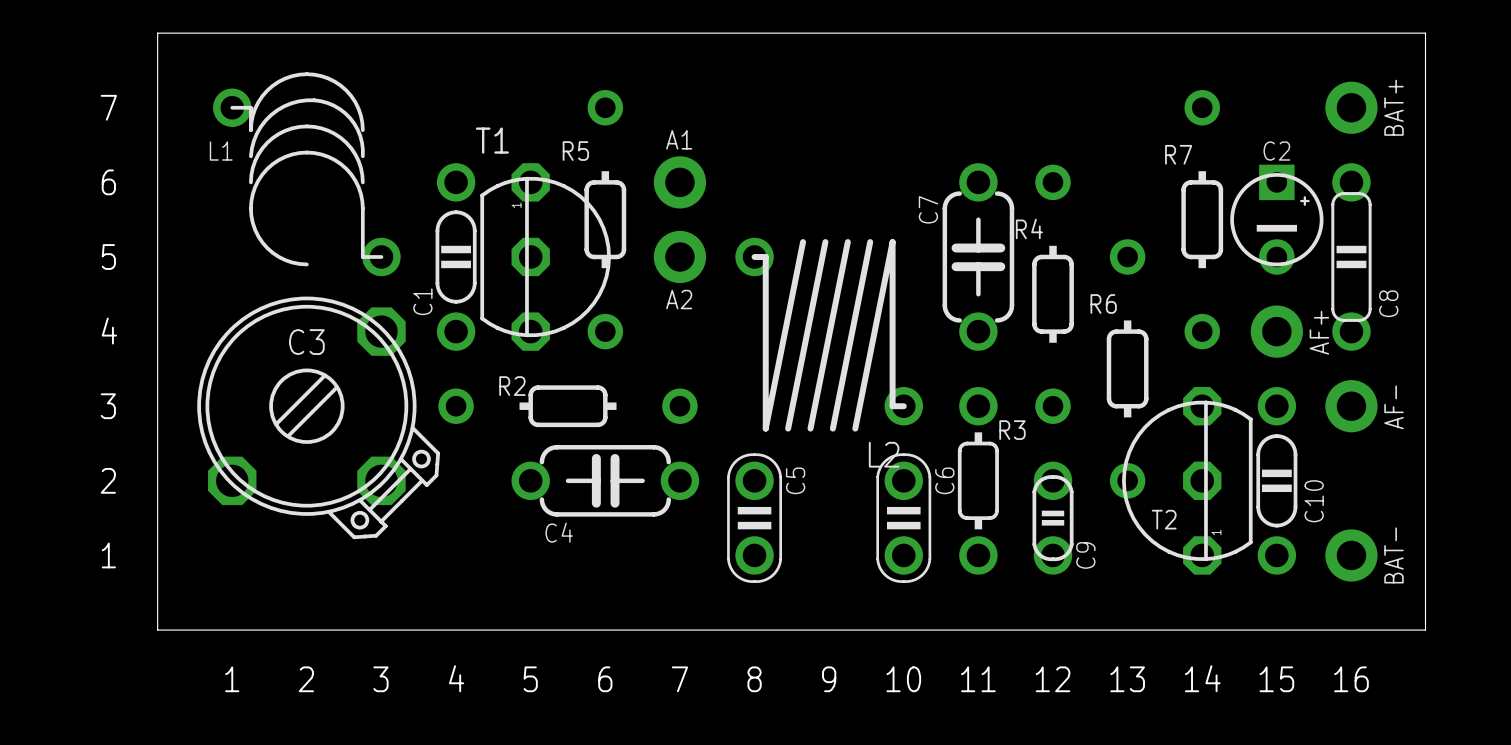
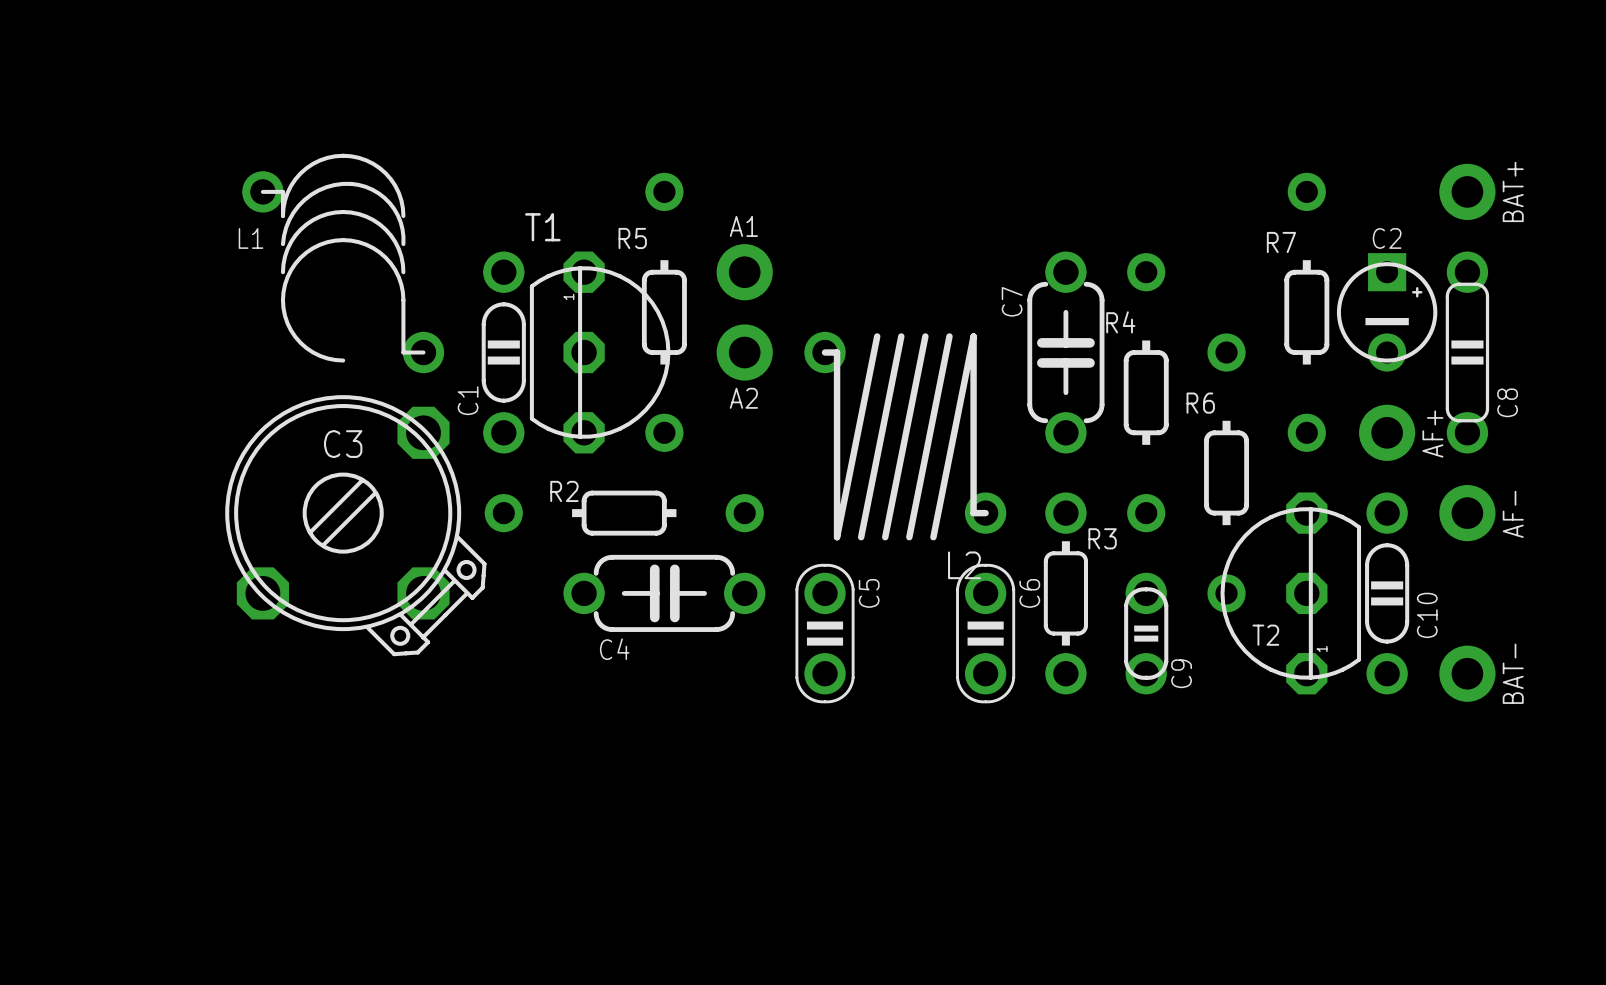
board edge: (157, 33) (1425, 33) (1425, 630) (157, 630) (157, 33) -> none
text: 7 (108, 107) -> none
text: 6 (108, 182) -> none
text: 5 (108, 256) -> none
text: 4 (109, 331) -> none
text: 3 (108, 406) -> none
text: 2 (108, 480) -> none
text: 1 (108, 555) -> none
text: 4 (456, 678) -> none
text: 14 (1202, 678) -> none
text: 1 (232, 679) -> none
text: 2 (306, 679) -> none
text: 3 (380, 679) -> none
text: 5 (530, 679) -> none
text: 6 (605, 679) -> none
text: 7 (679, 679) -> none
text: 8 (754, 679) -> none
text: 9 (829, 679) -> none
text: 10 (903, 679) -> none
text: 11 (978, 679) -> none
text: 12 (1053, 679) -> none
text: 13 (1127, 679) -> none
text: 15 (1276, 679) -> none
text: 16 (1351, 679) -> none

